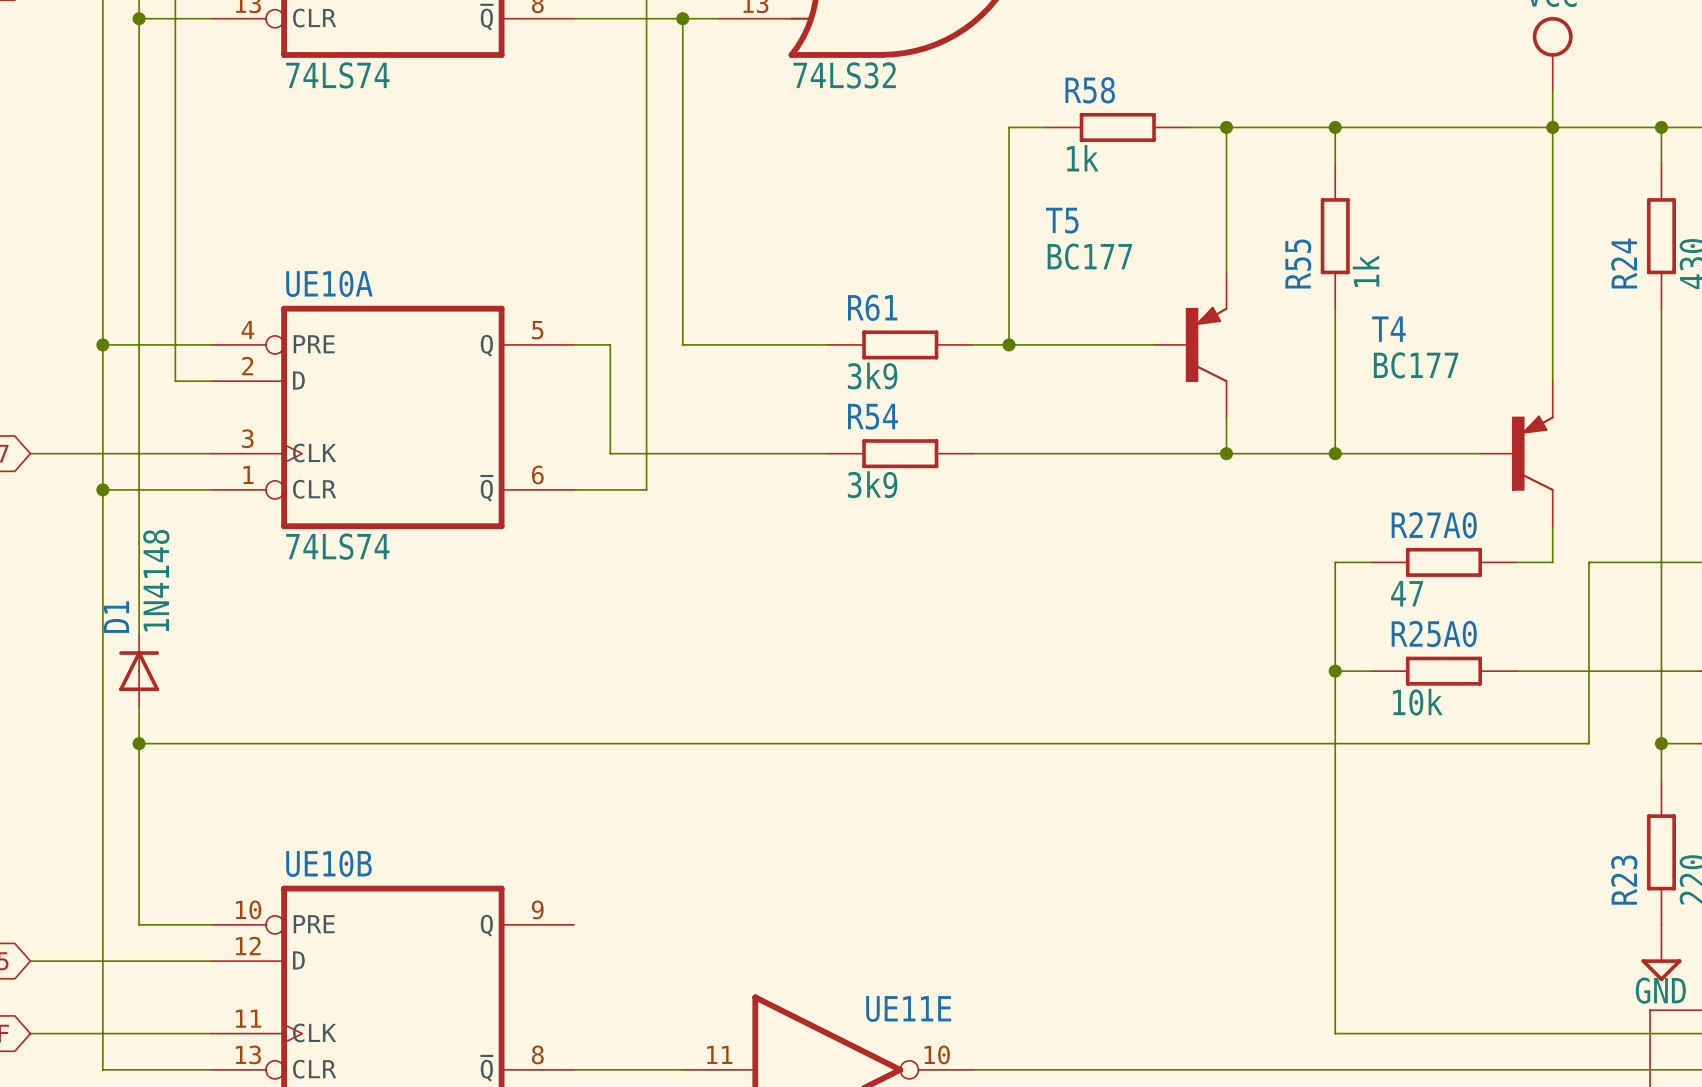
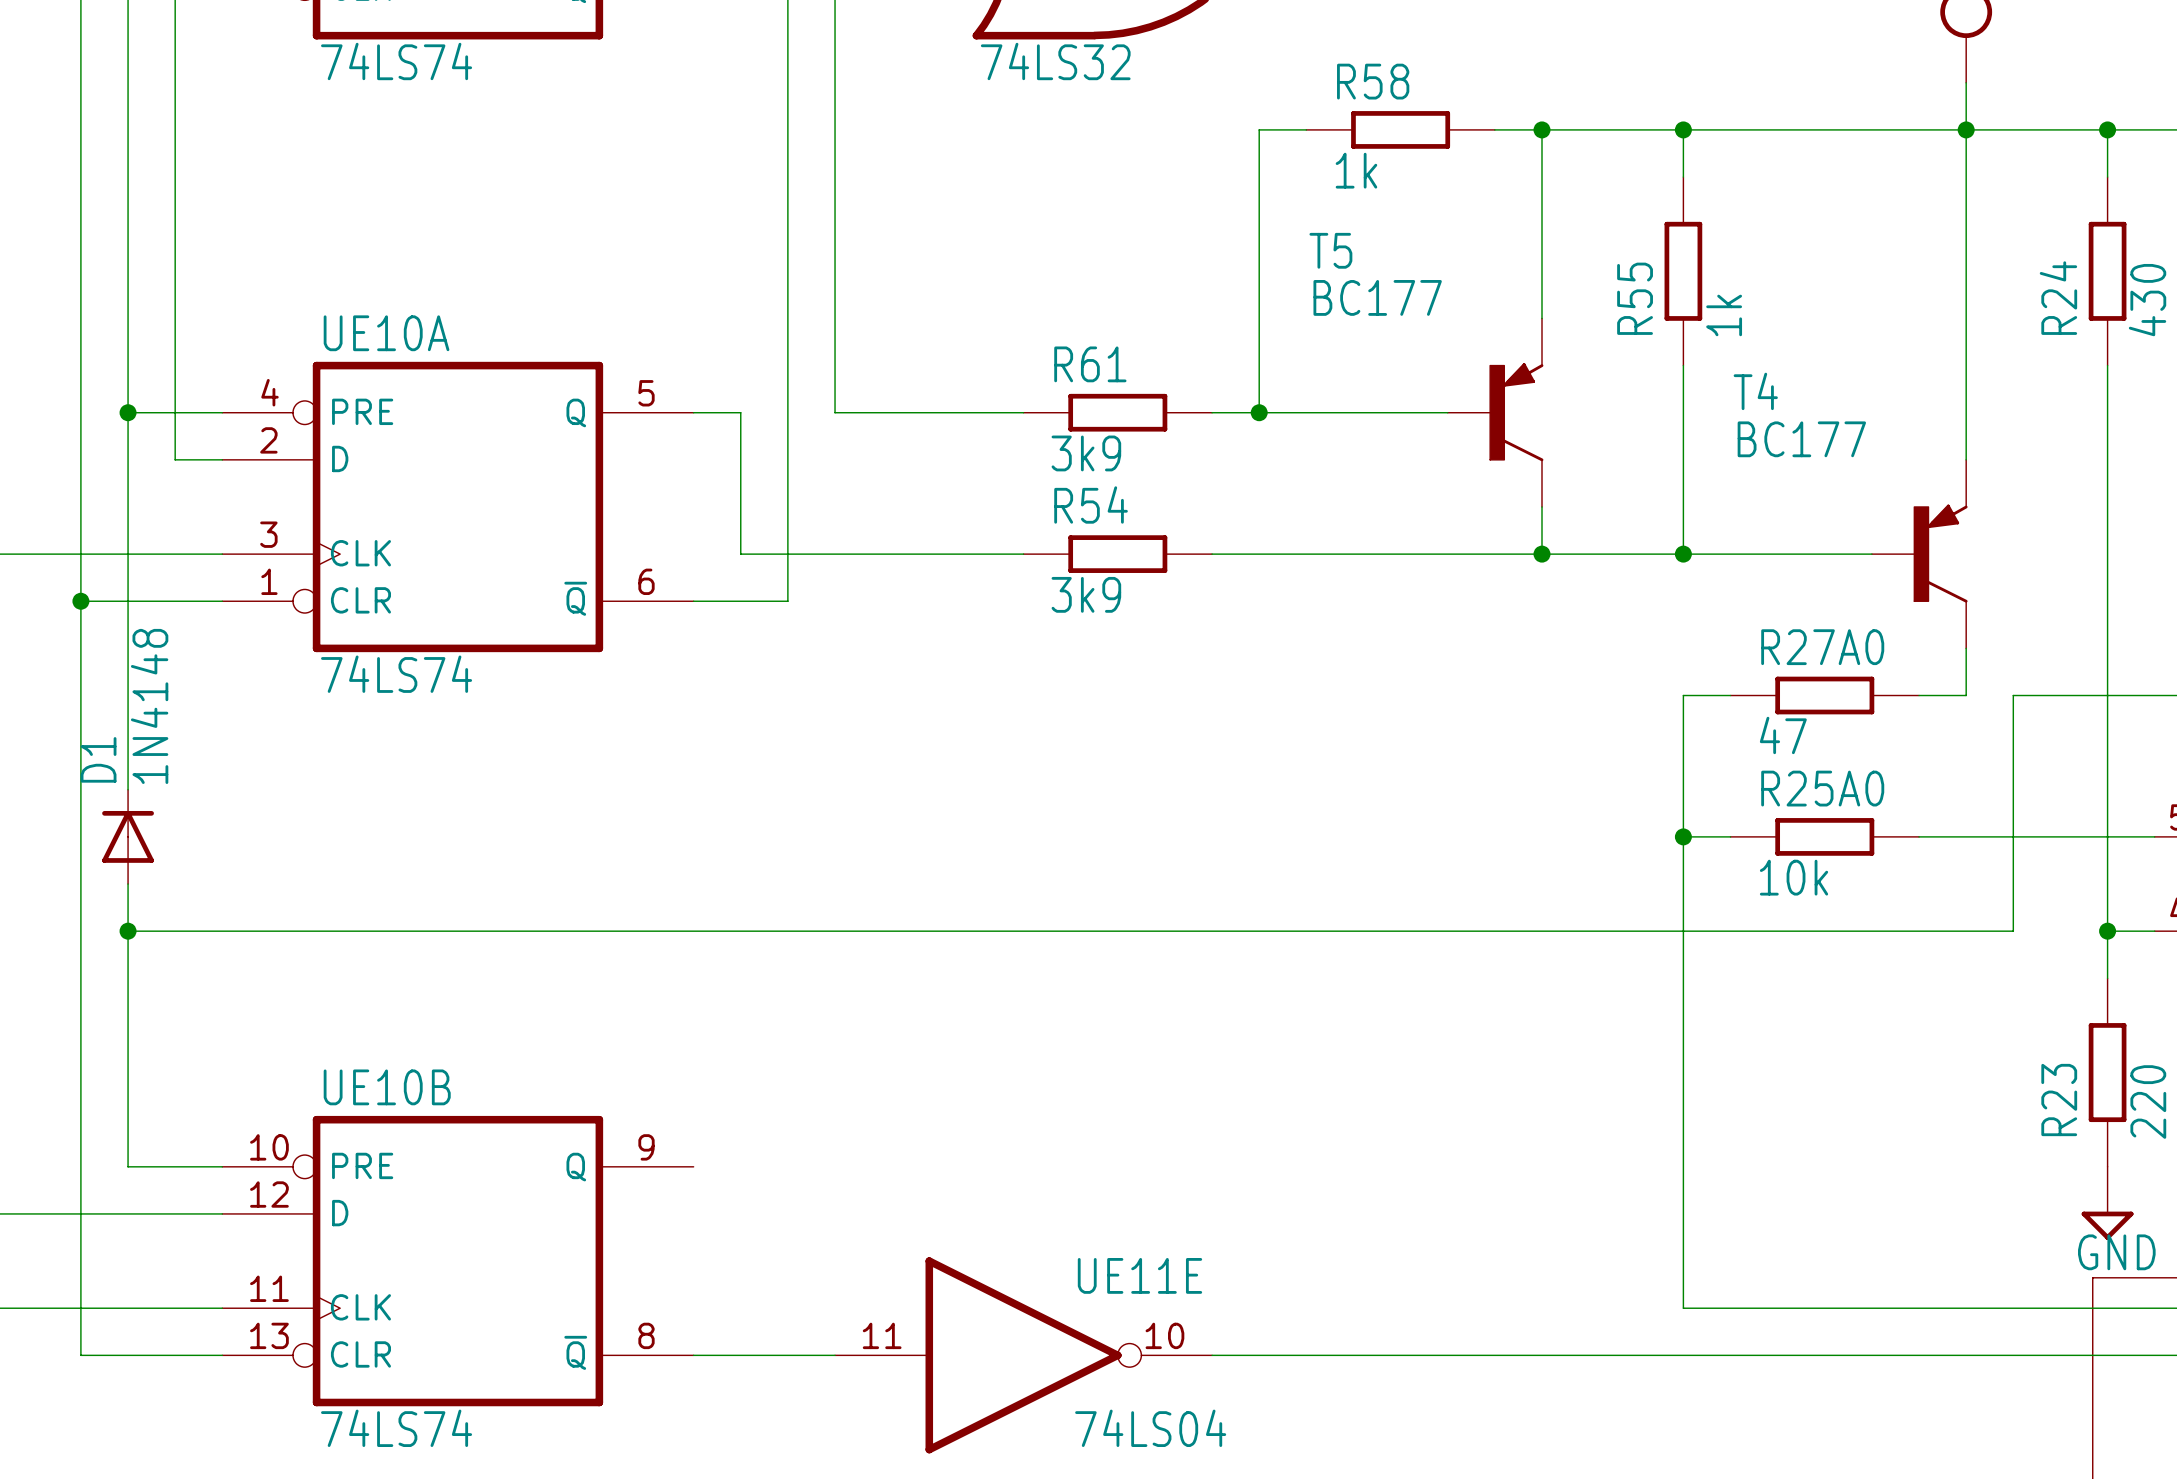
wire: (102, 344) (139, 344) -> none
junction position: (102, 344) -> (128, 412)

